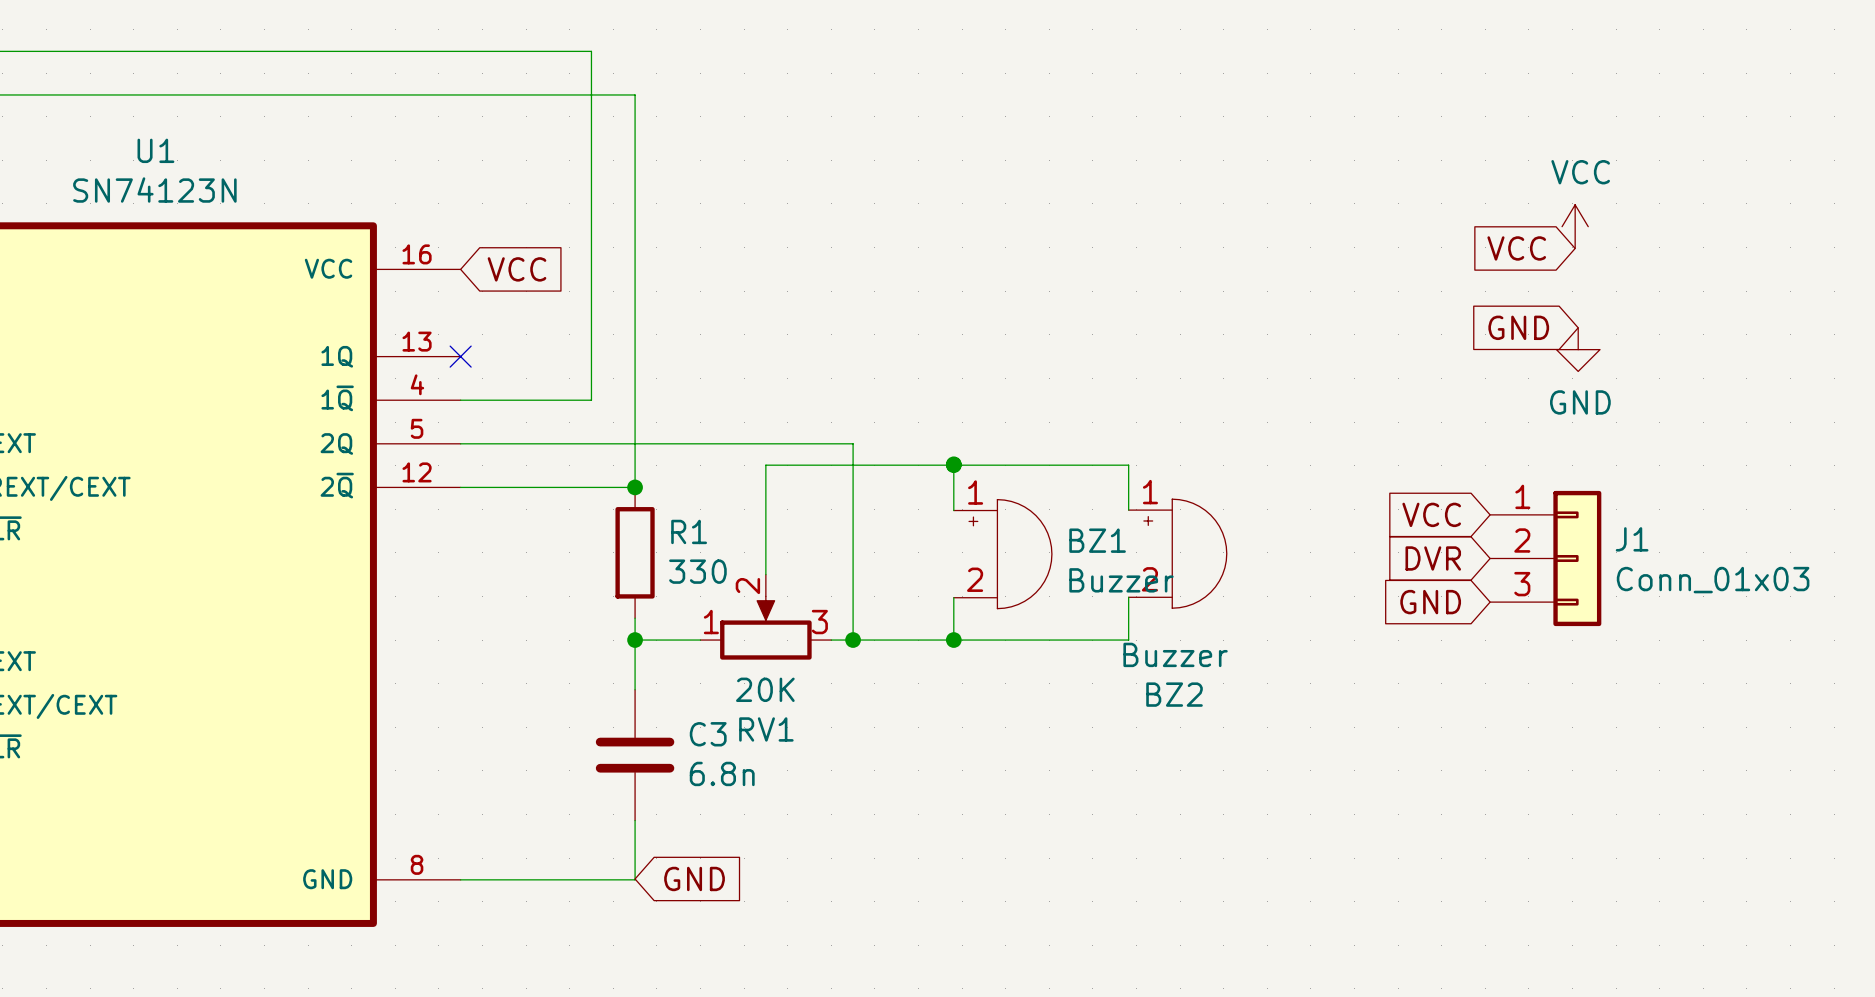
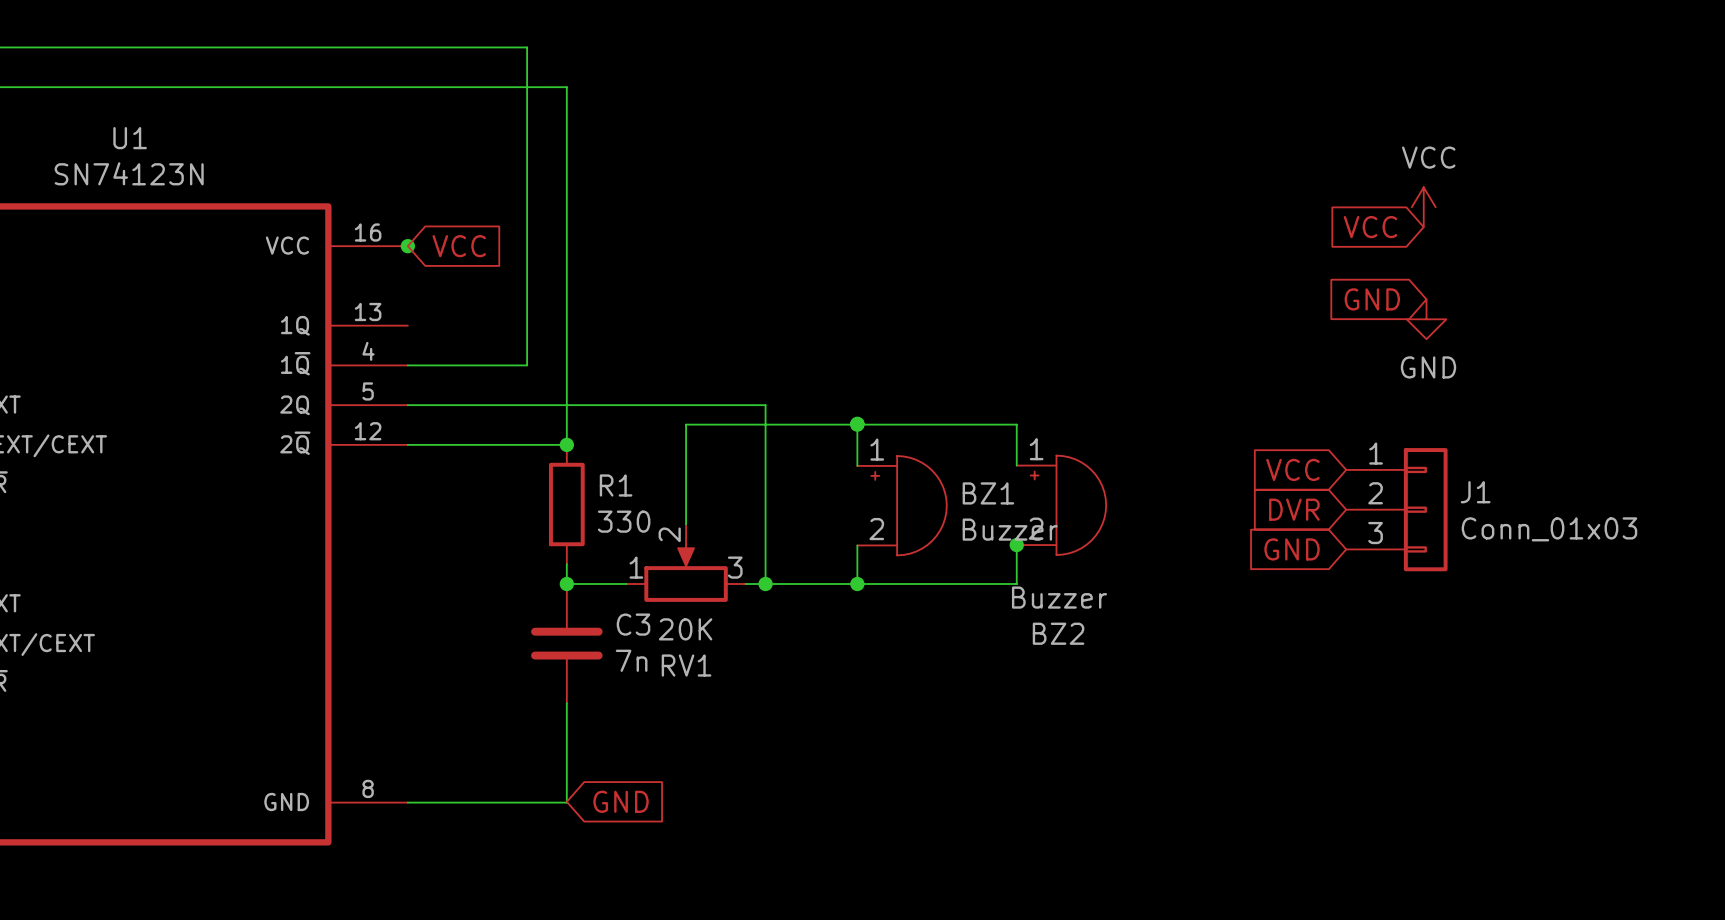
junction: none -> (407, 246)
no-connect mark: (460, 356) -> none
junction: none -> (1016, 545)
C3 position: (635, 755) -> (566, 643)
C3 value: 6.8n (722, 773) -> 7n (631, 660)

